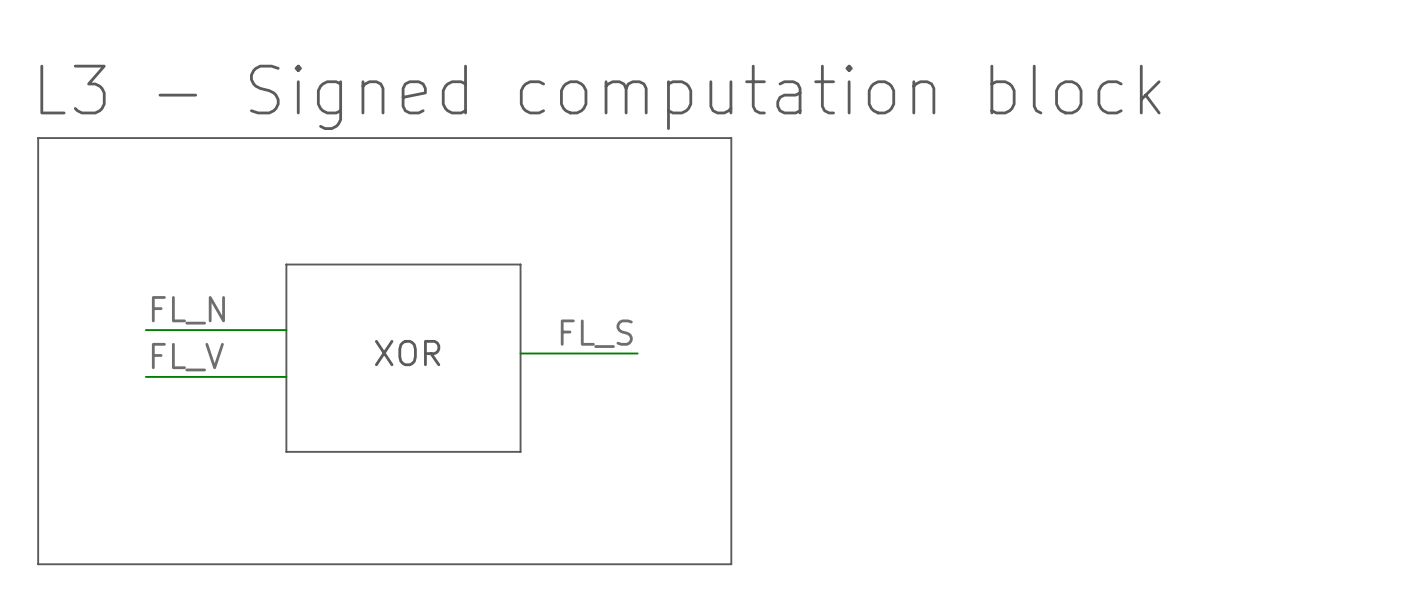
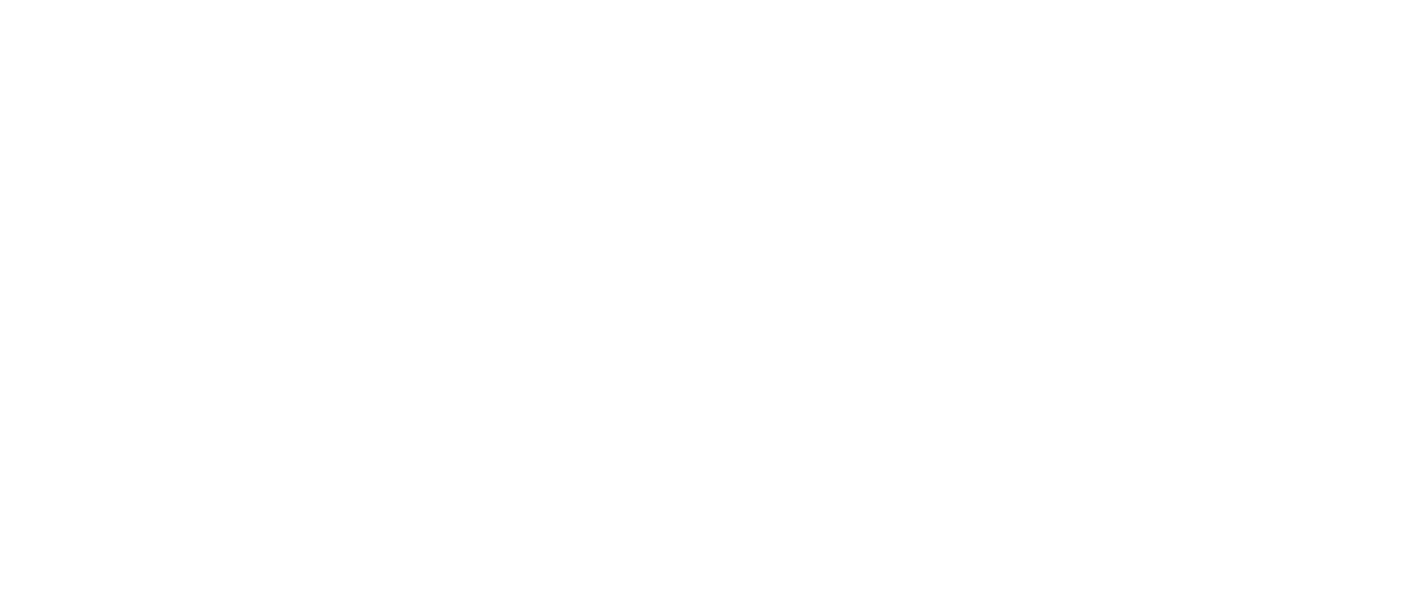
text: L3 - Signed computation block (600, 97) -> none
line: (38, 138) (731, 138) (731, 564) (38, 564) (38, 138) -> none
line: (286, 264) (520, 264) (520, 451) (286, 451) (286, 264) -> none
label: FL_N (188, 310) -> none
wire: (145, 330) (286, 330) -> none
label: FL_S (596, 333) -> none
text: XOR (407, 353) -> none
wire: (520, 353) (637, 353) -> none
label: FL_V (187, 357) -> none
wire: (145, 376) (286, 376) -> none

